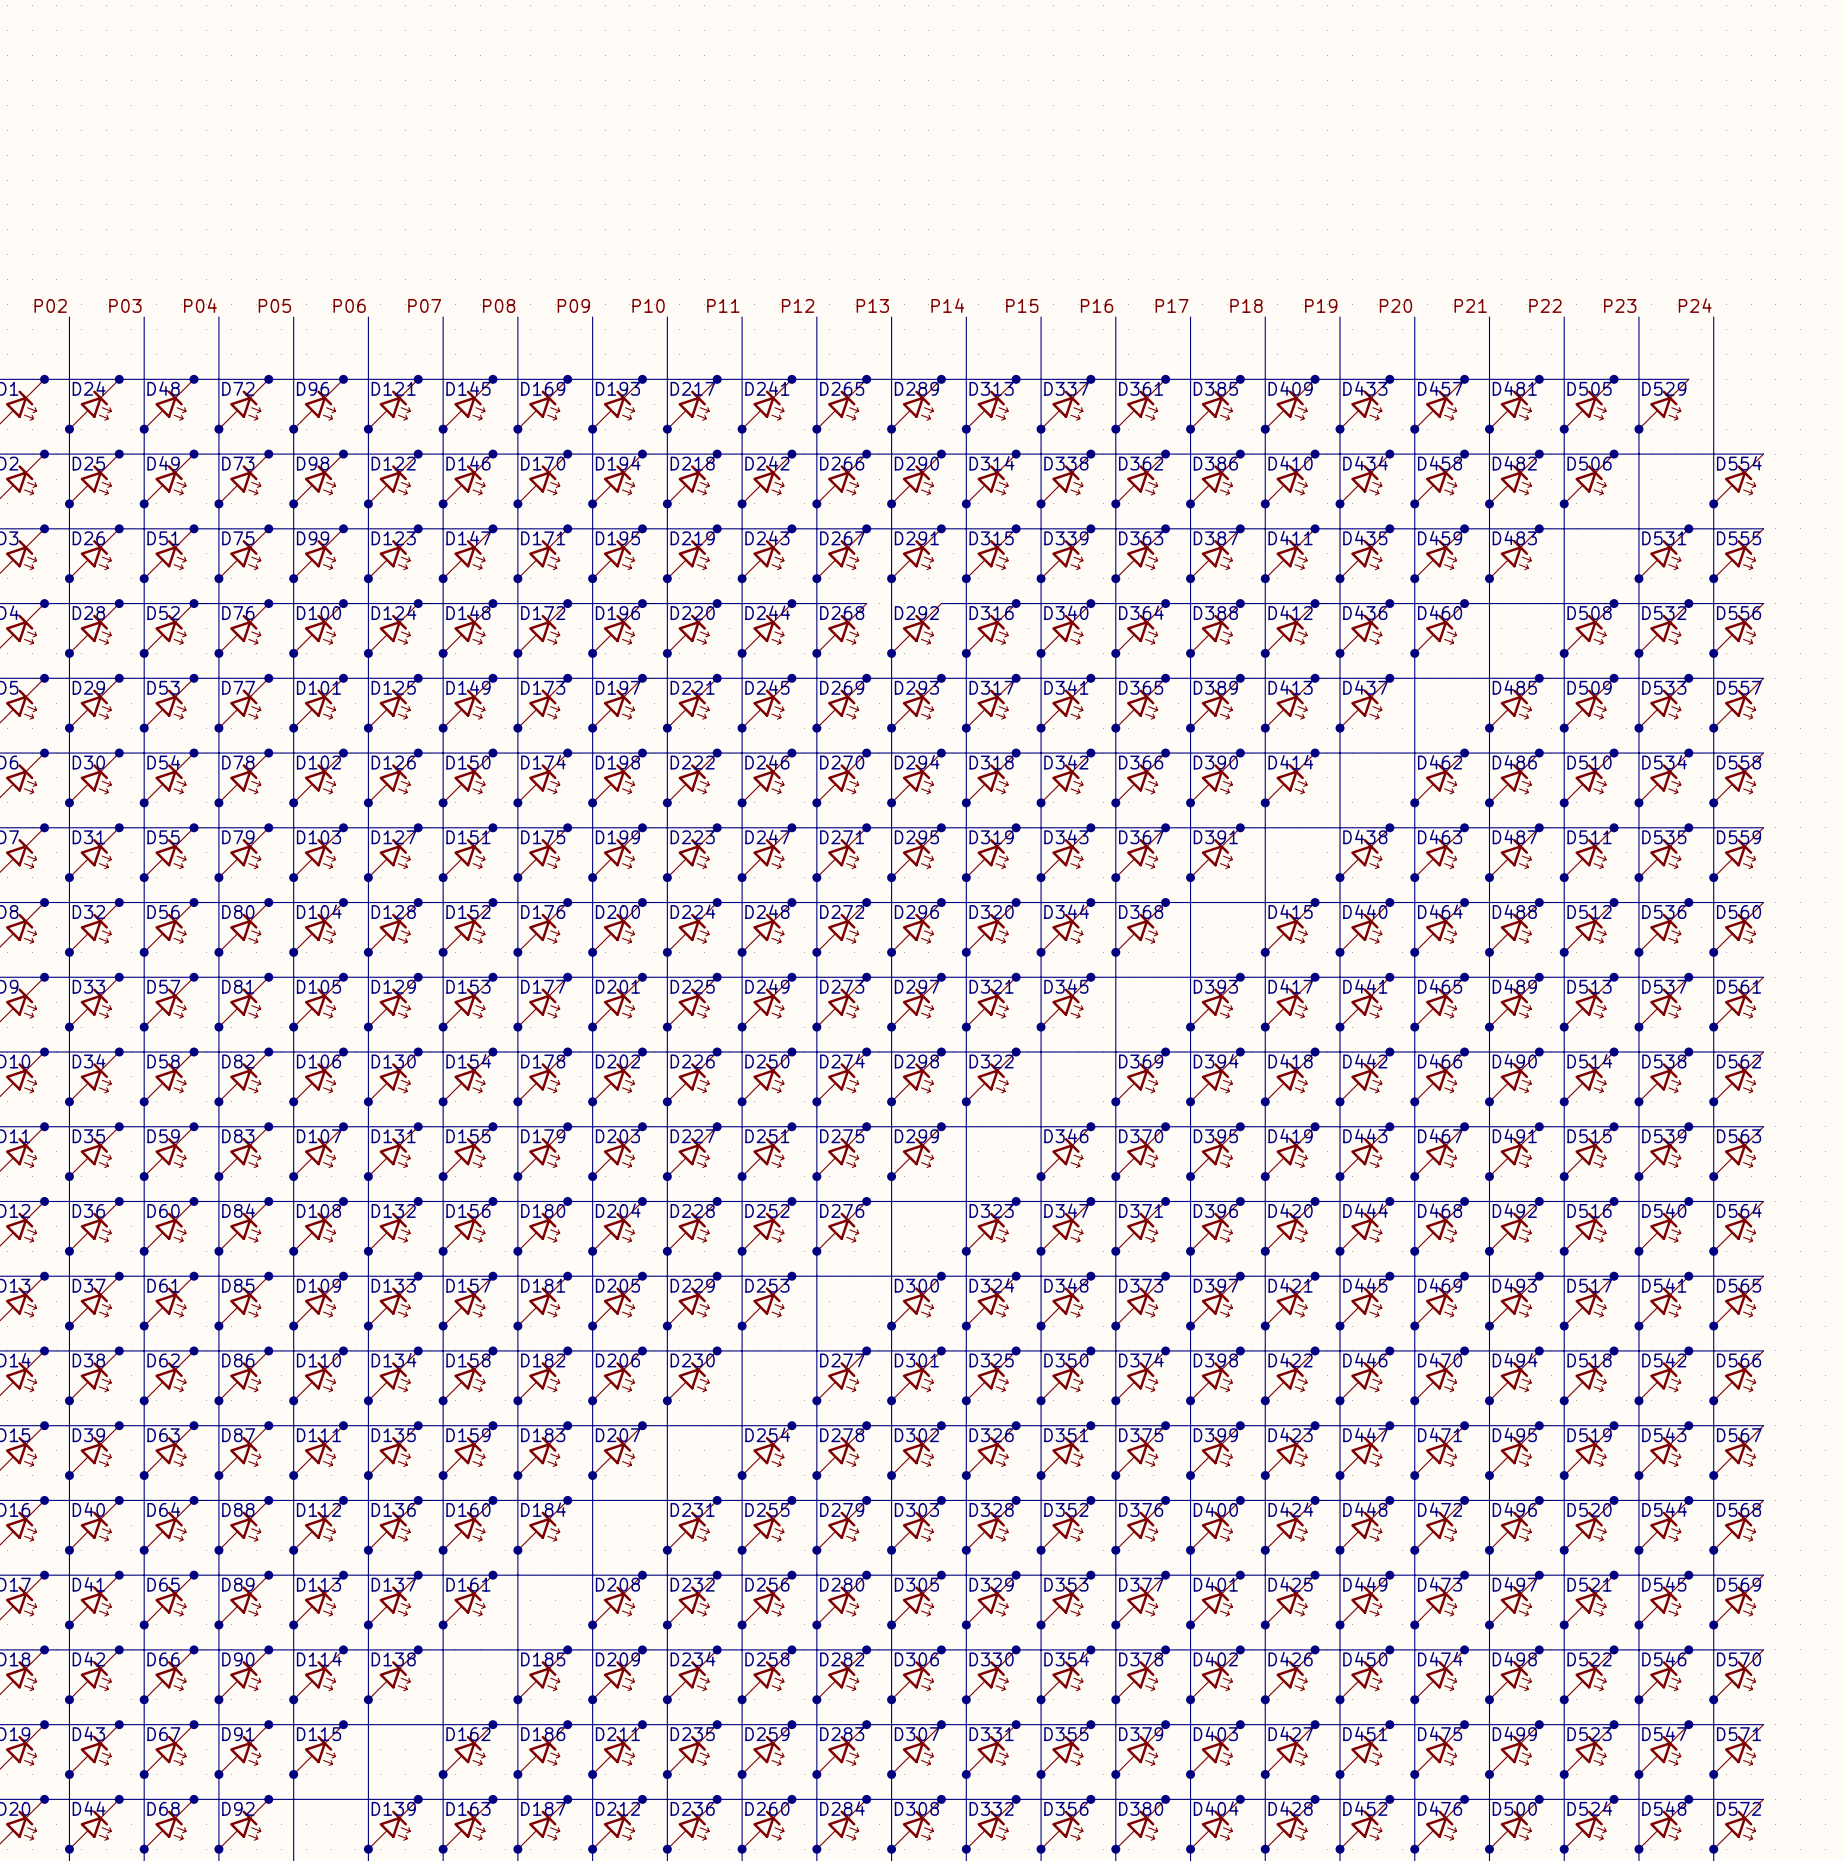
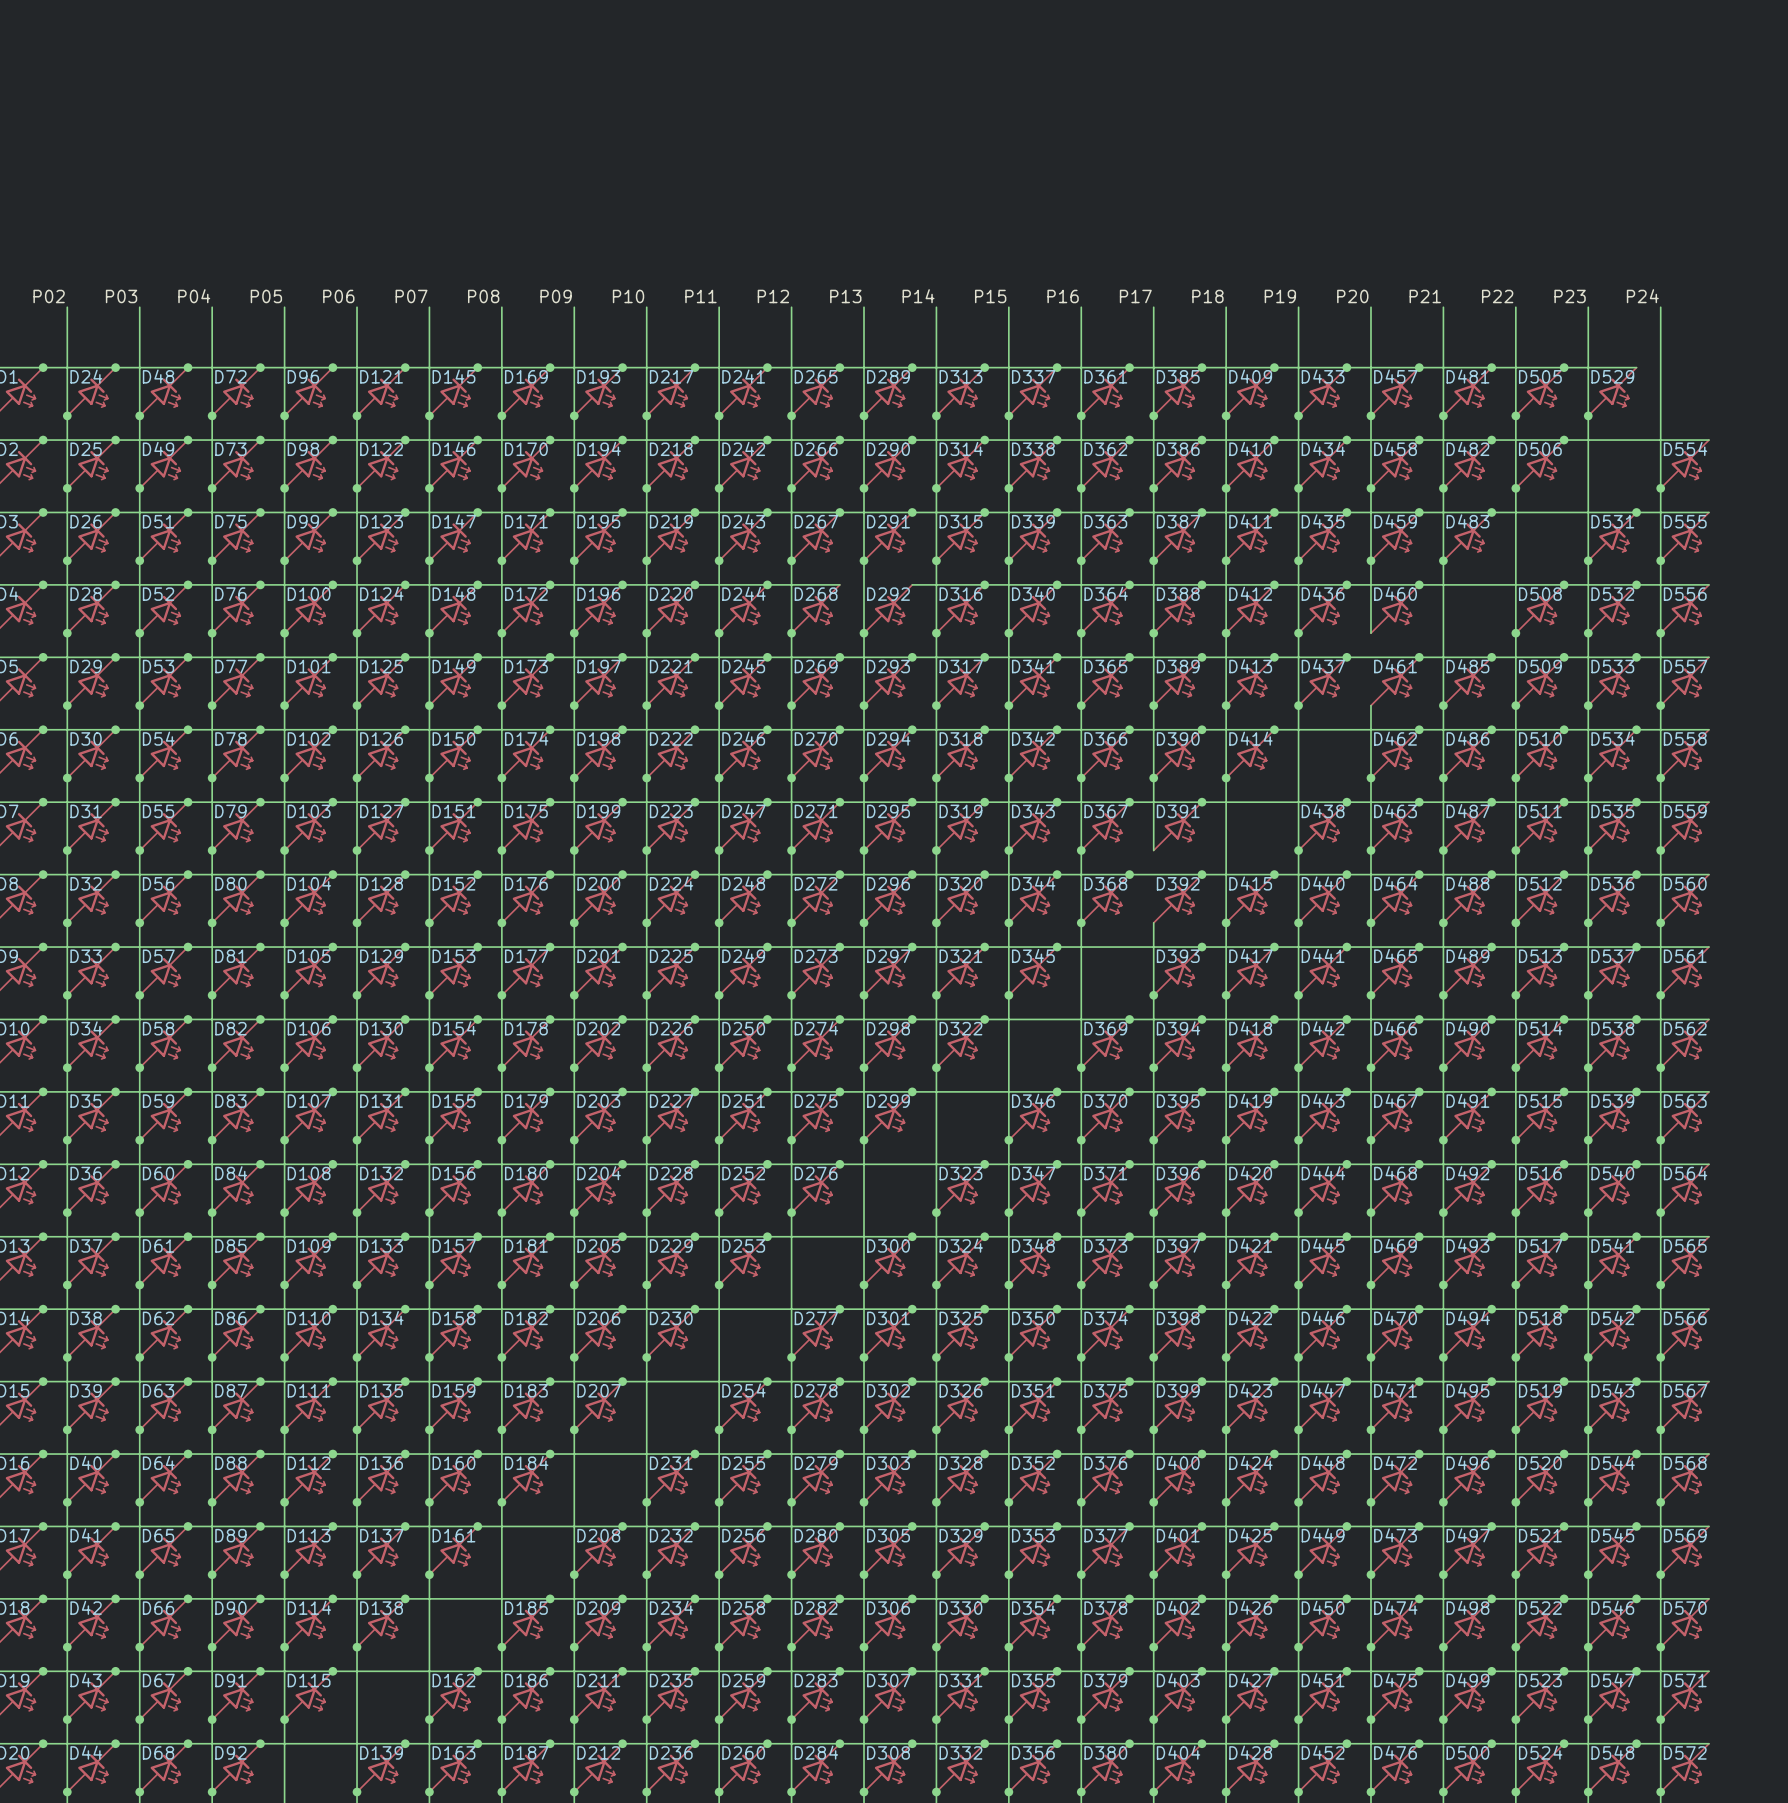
wire: (1414, 653) (1414, 728) -> none
junction position: (1414, 653) -> (1419, 657)
D461: none -> (1395, 681)
wire: (1190, 877) (1190, 952) -> none
junction position: (1190, 877) -> (1201, 874)
D392: none -> (1177, 898)

